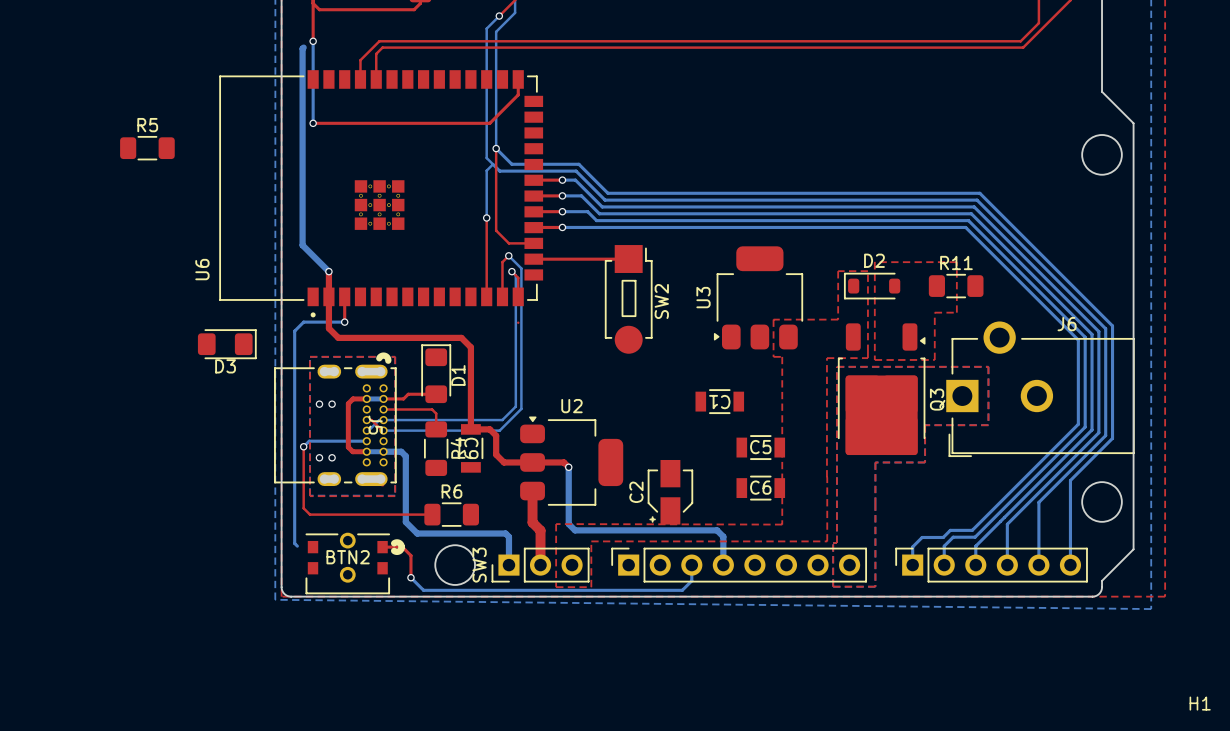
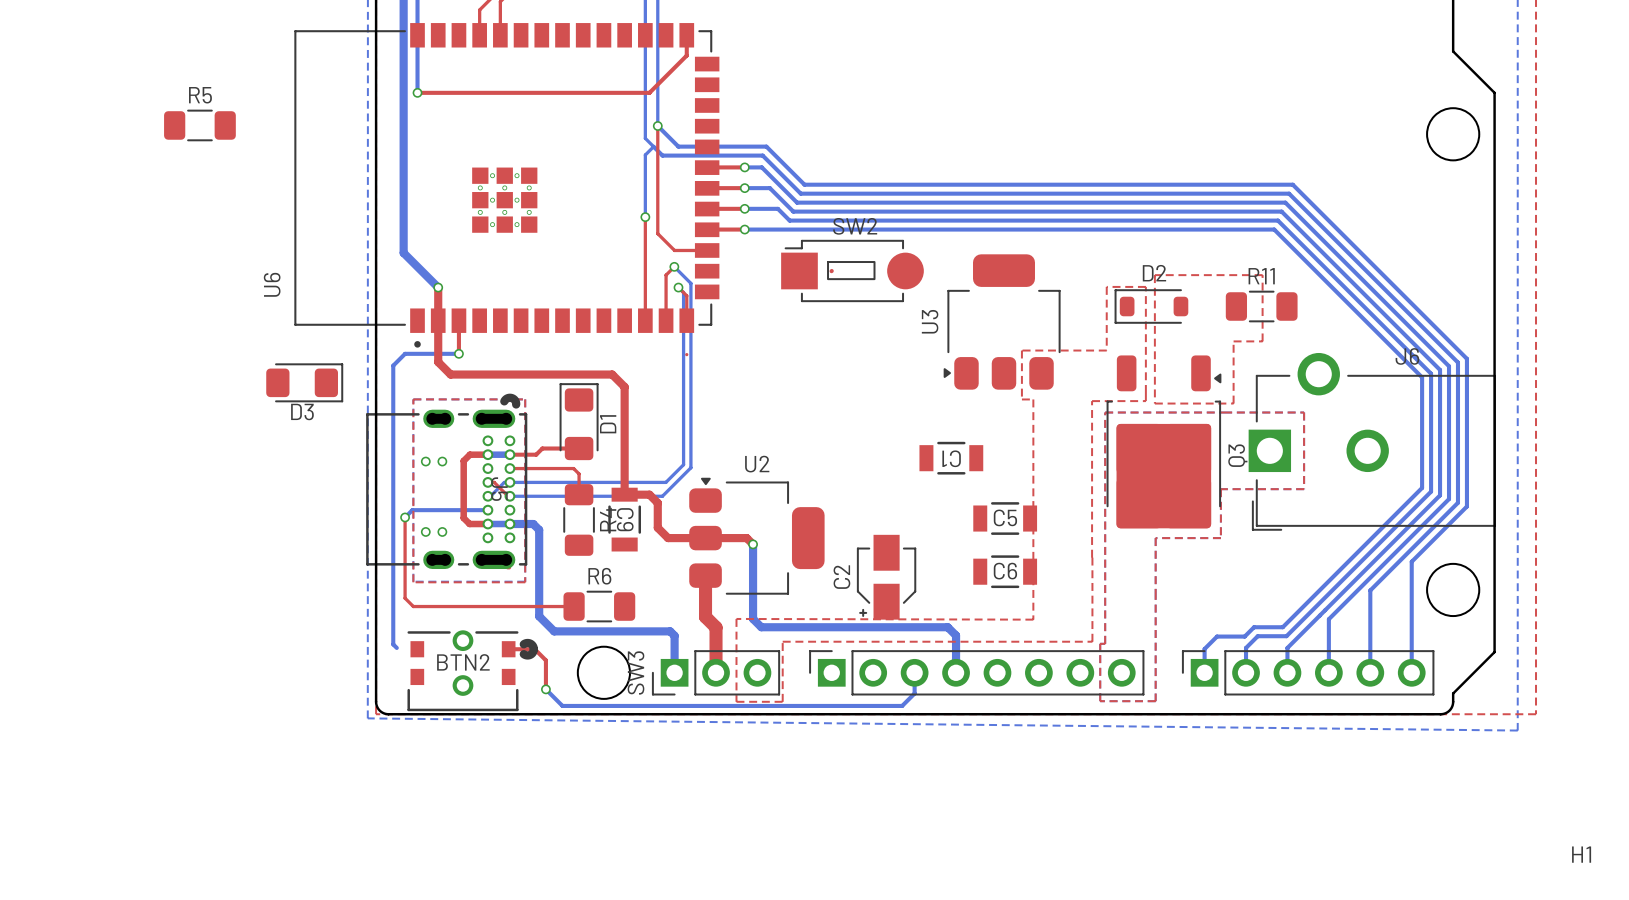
top track: (533, 259) (628, 259) -> none
SW2 rotation: 0° (628, 299) -> 90° counterclockwise (852, 270)

